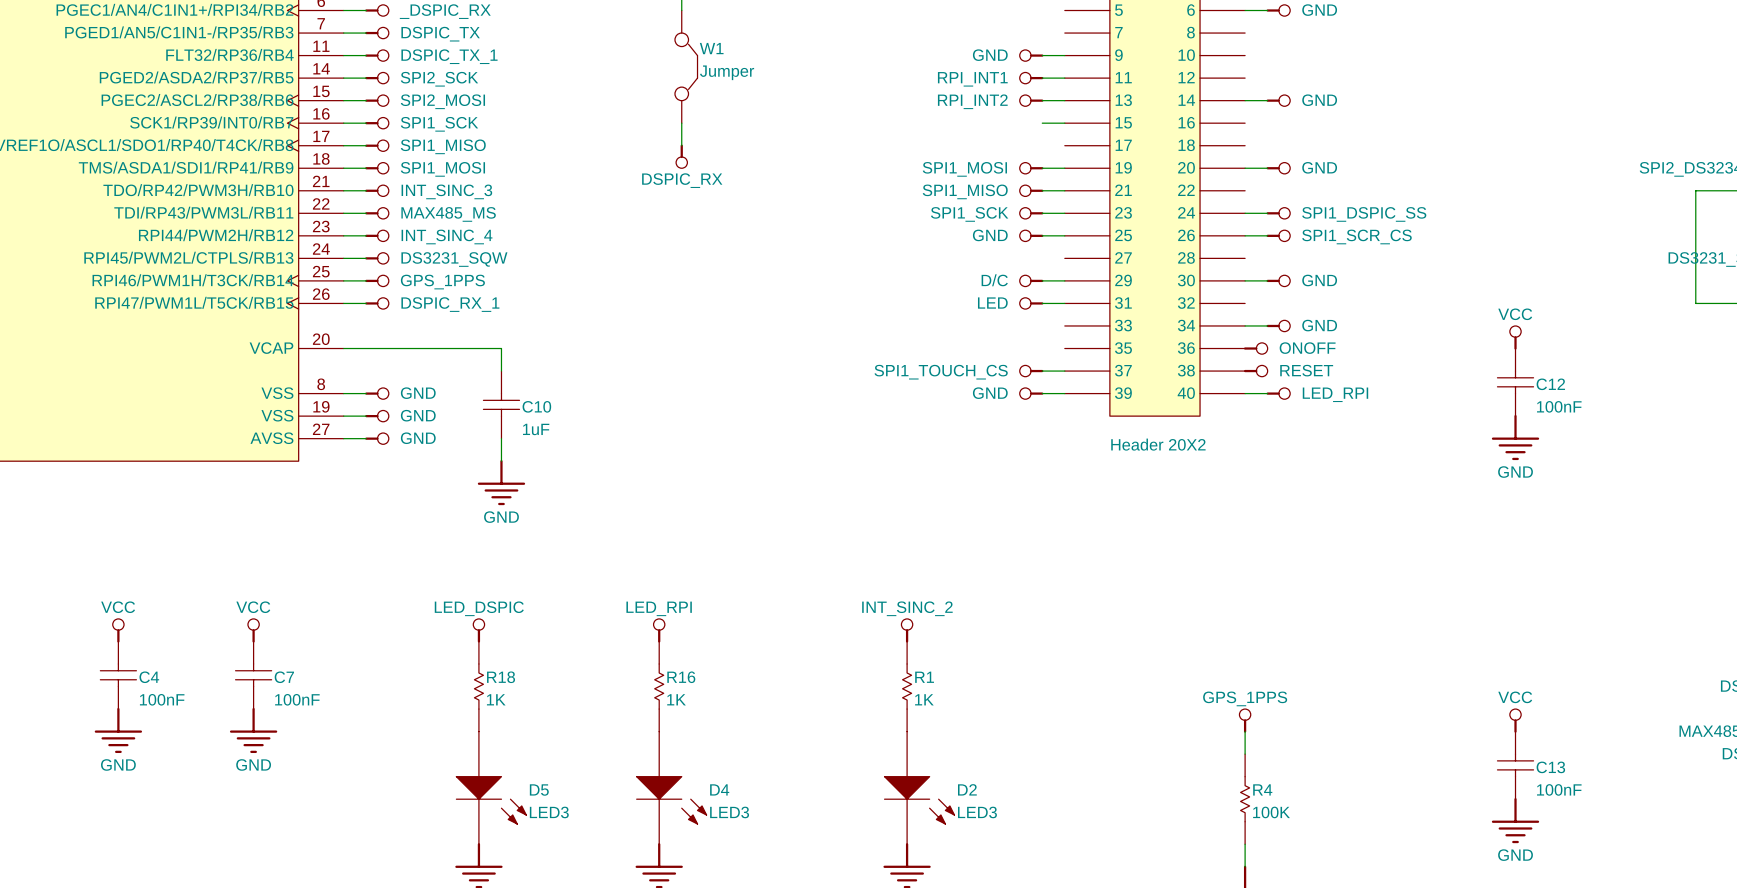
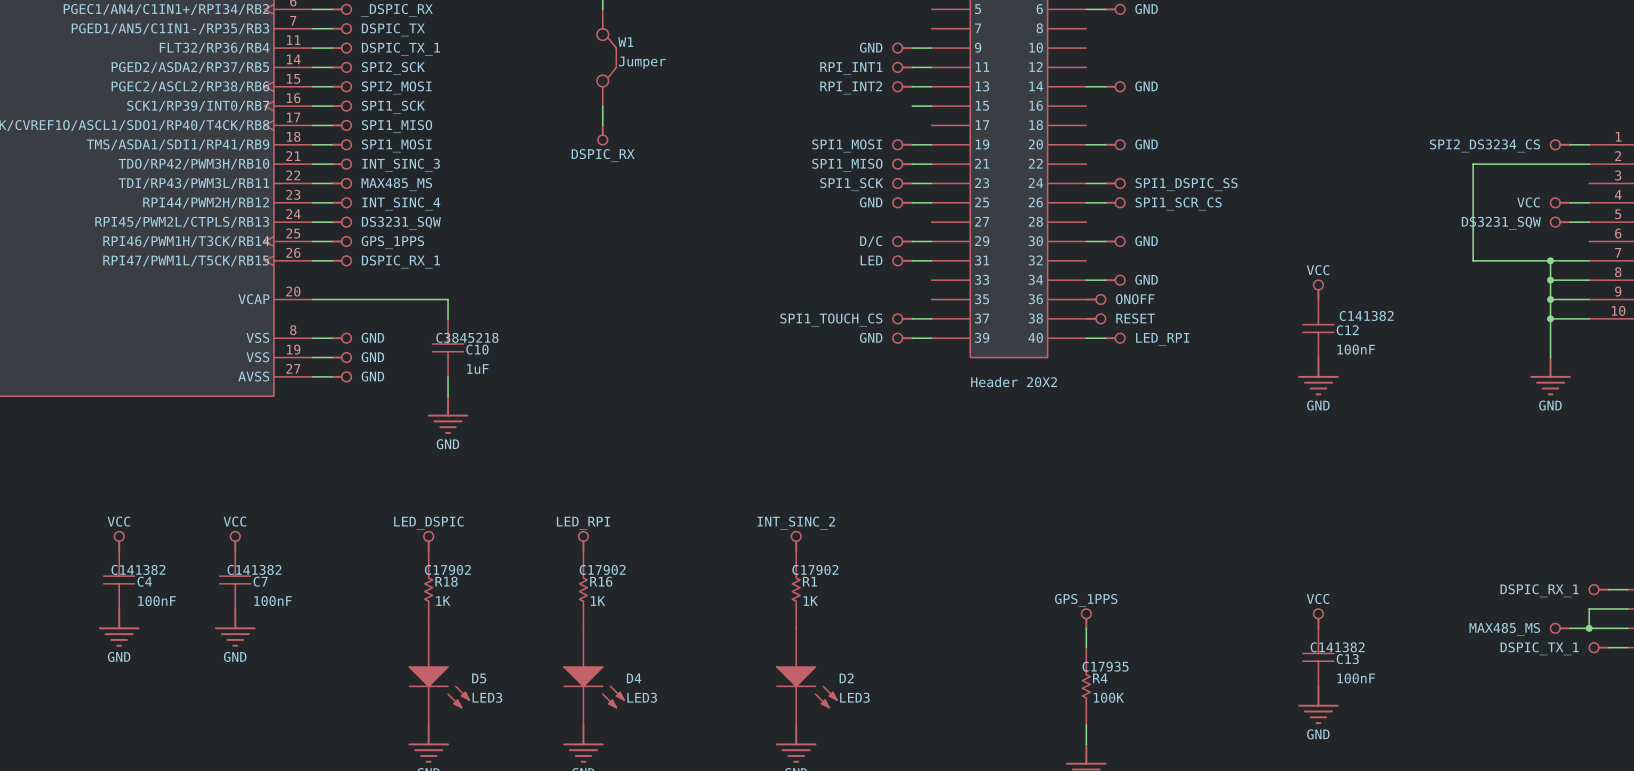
C12 text: none -> C141382 (1366, 315)
C10 text: none -> C3845218 (467, 337)
C4 text: none -> C141382 (138, 569)
C7 text: none -> C141382 (254, 569)
R18 text: none -> C17902 (447, 569)
R16 text: none -> C17902 (602, 569)
R1 text: none -> C17902 (815, 569)
C13 text: none -> C141382 (1337, 647)
R4 text: none -> C17935 (1105, 666)

